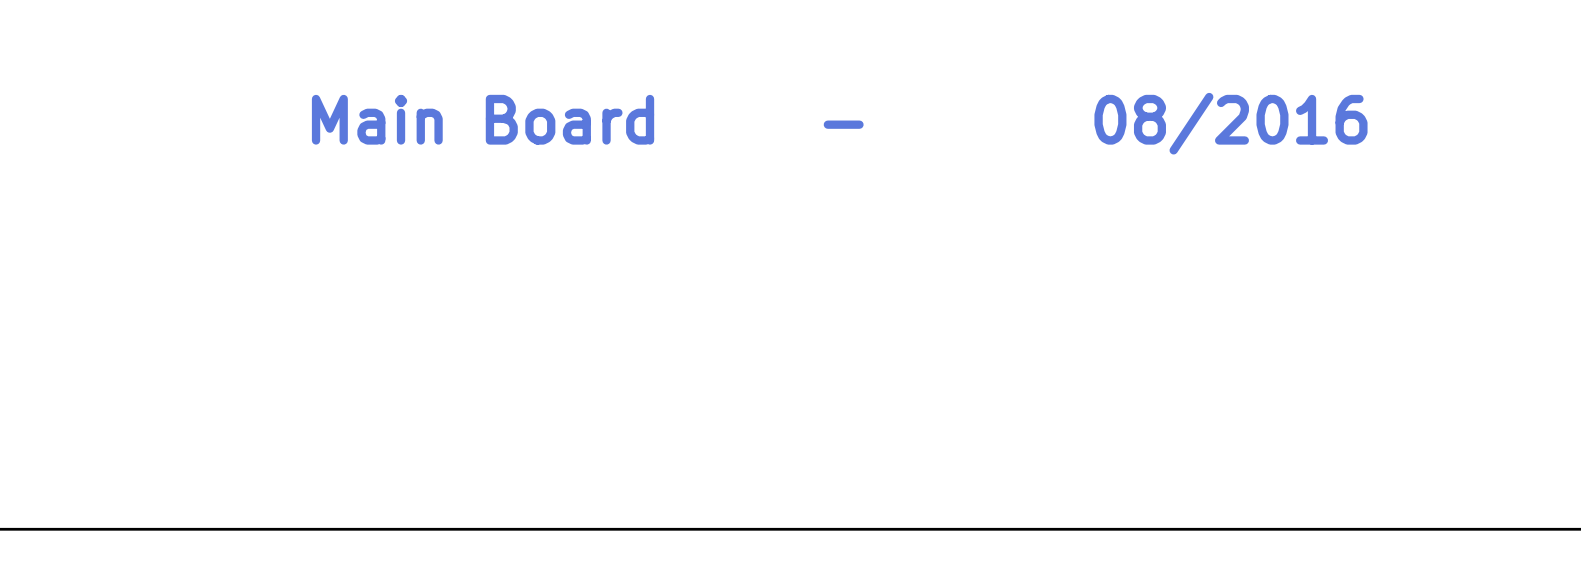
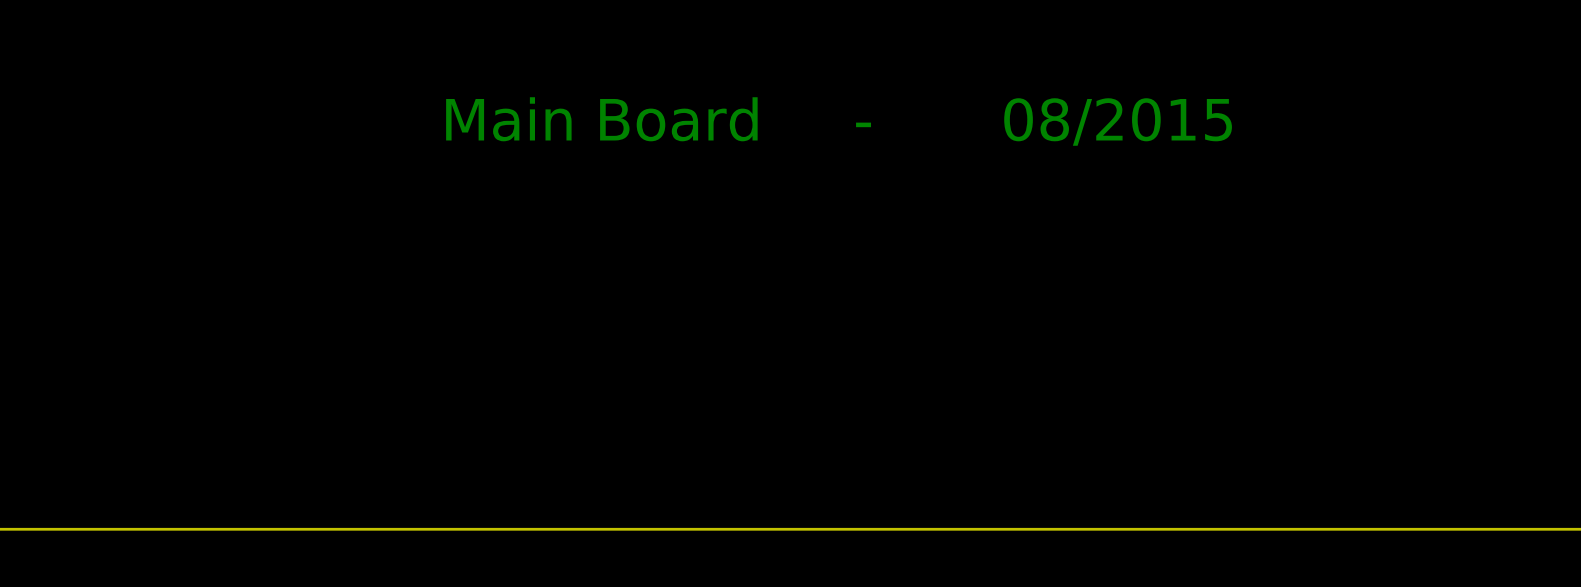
text: Main Board - 08/2016 (839, 123) -> Main Board - 08/2015 (839, 121)

